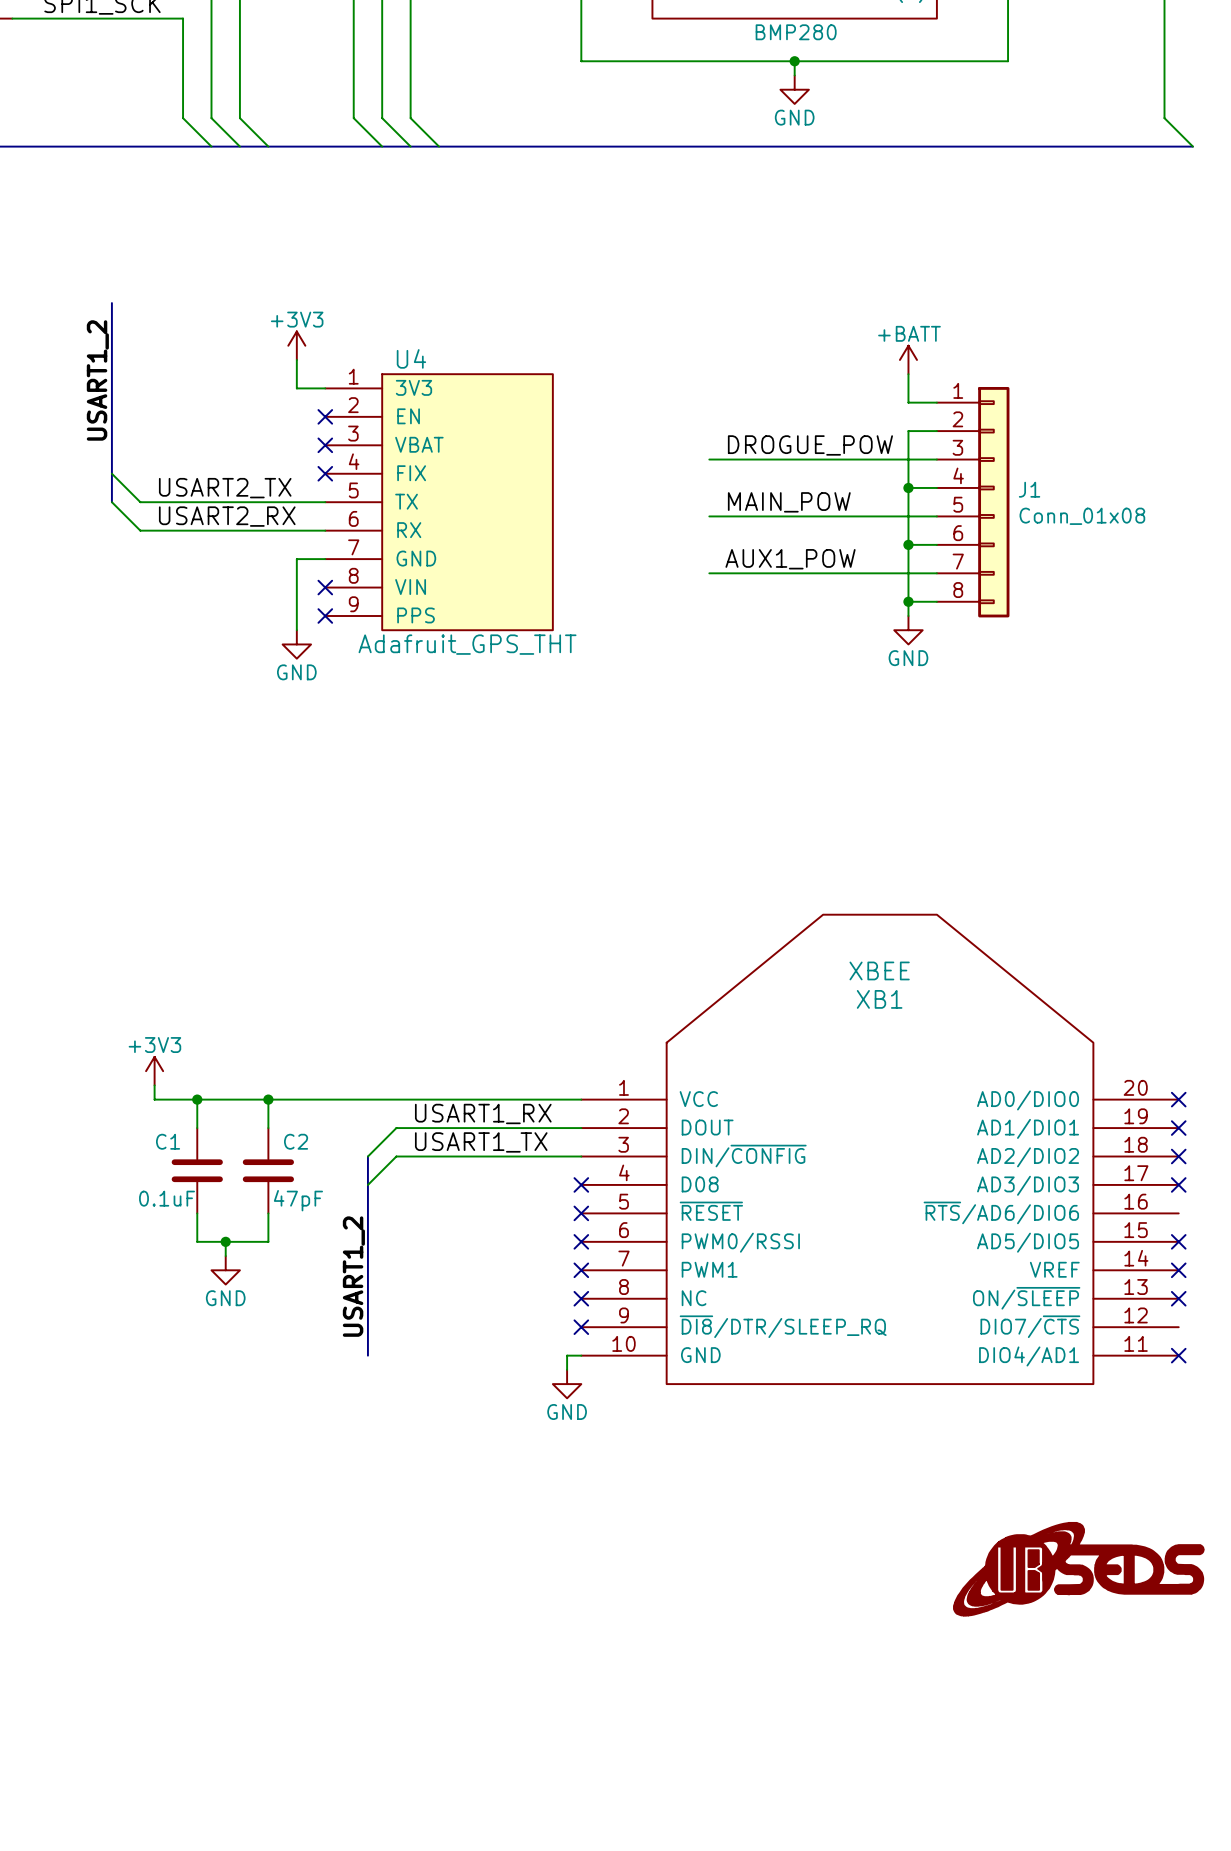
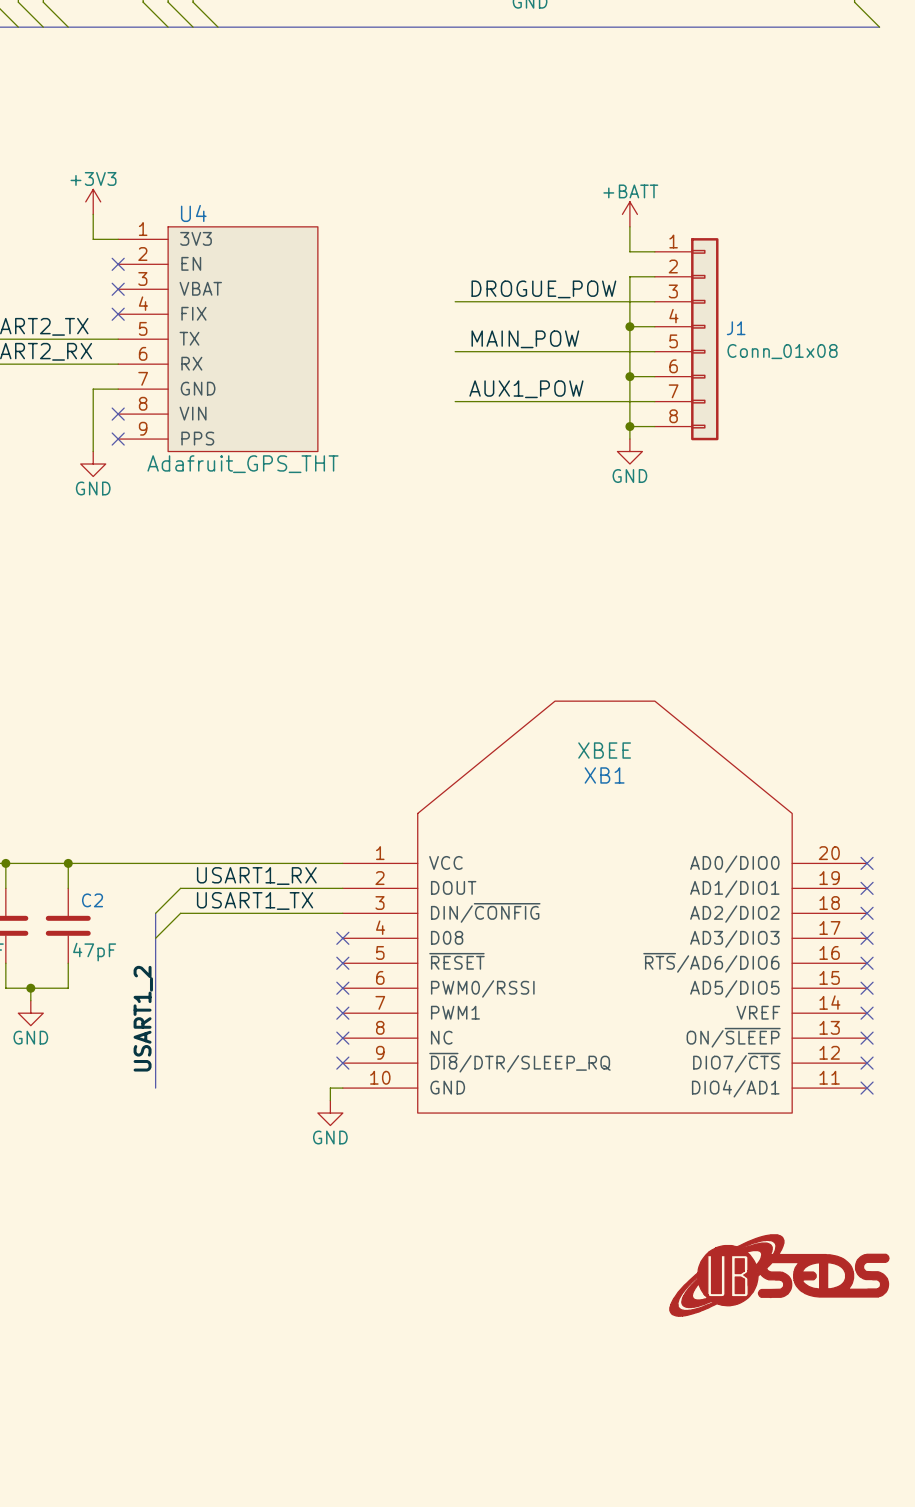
no-connect mark: none -> (867, 963)
no-connect mark: none -> (867, 1063)

